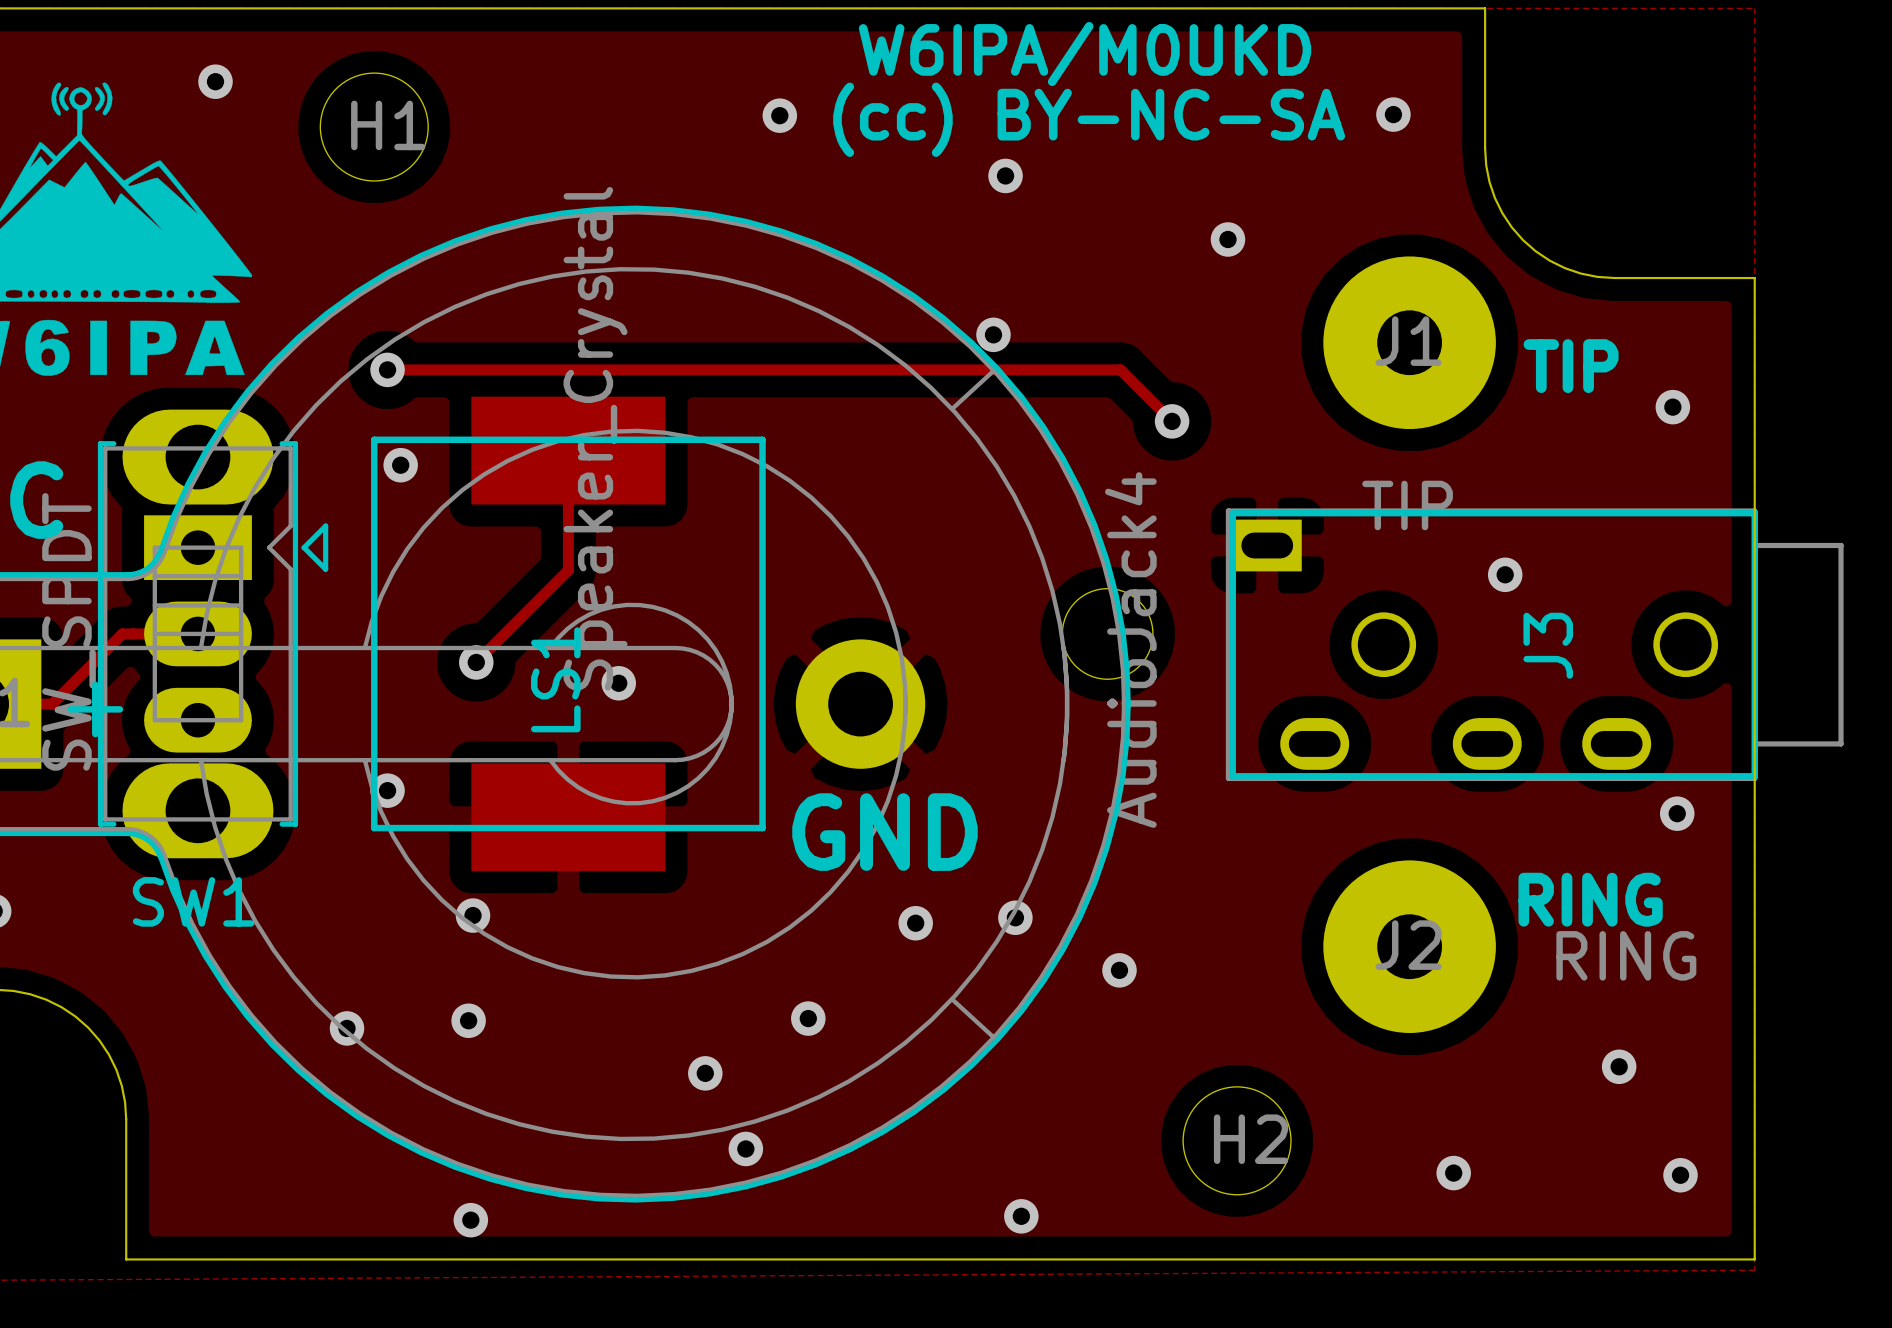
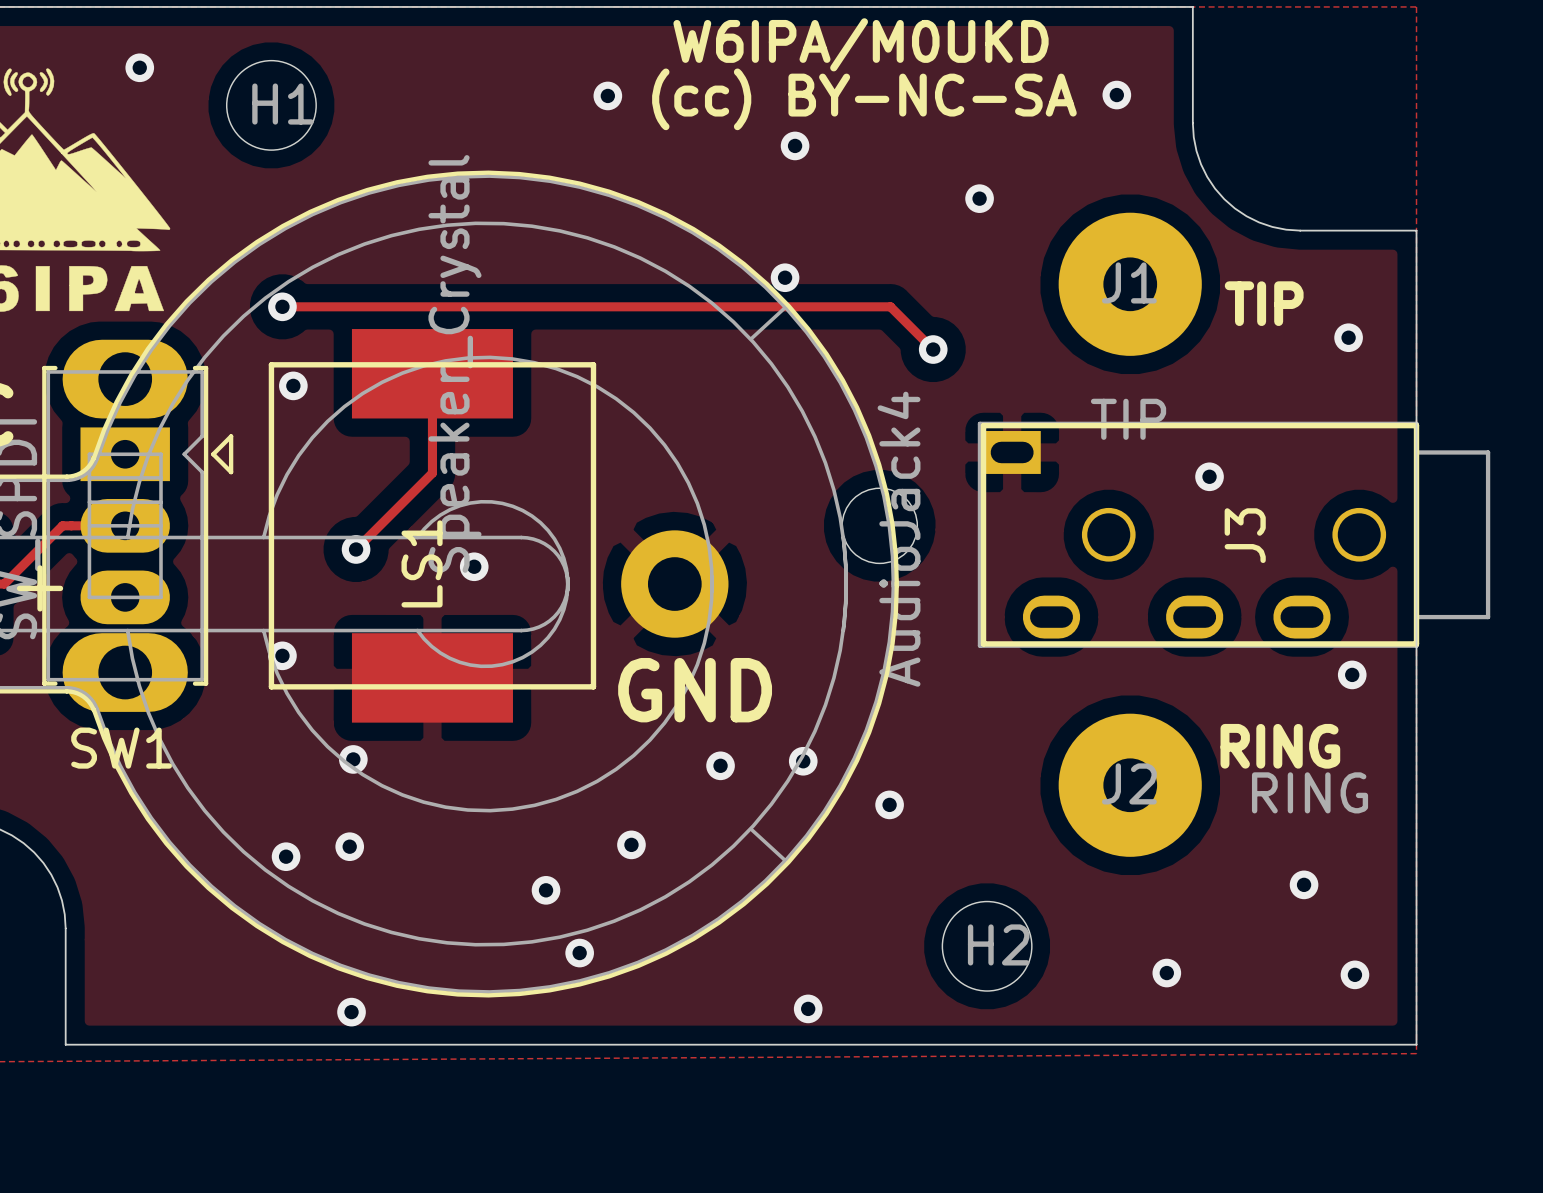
via position: (346, 1028) -> (286, 856)

